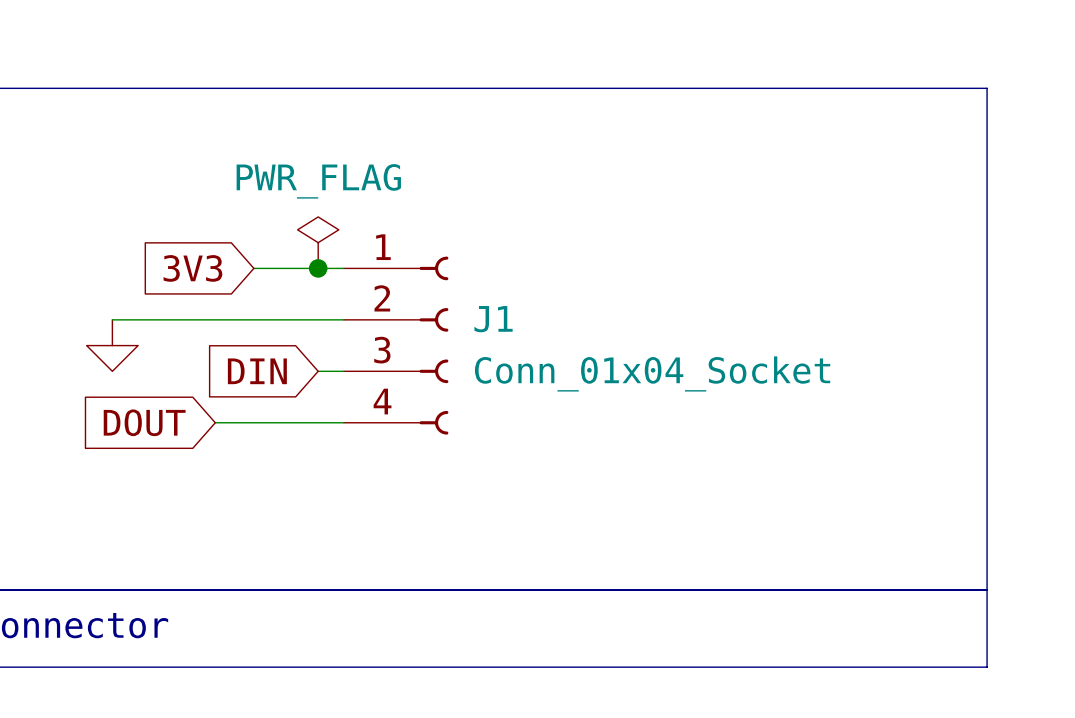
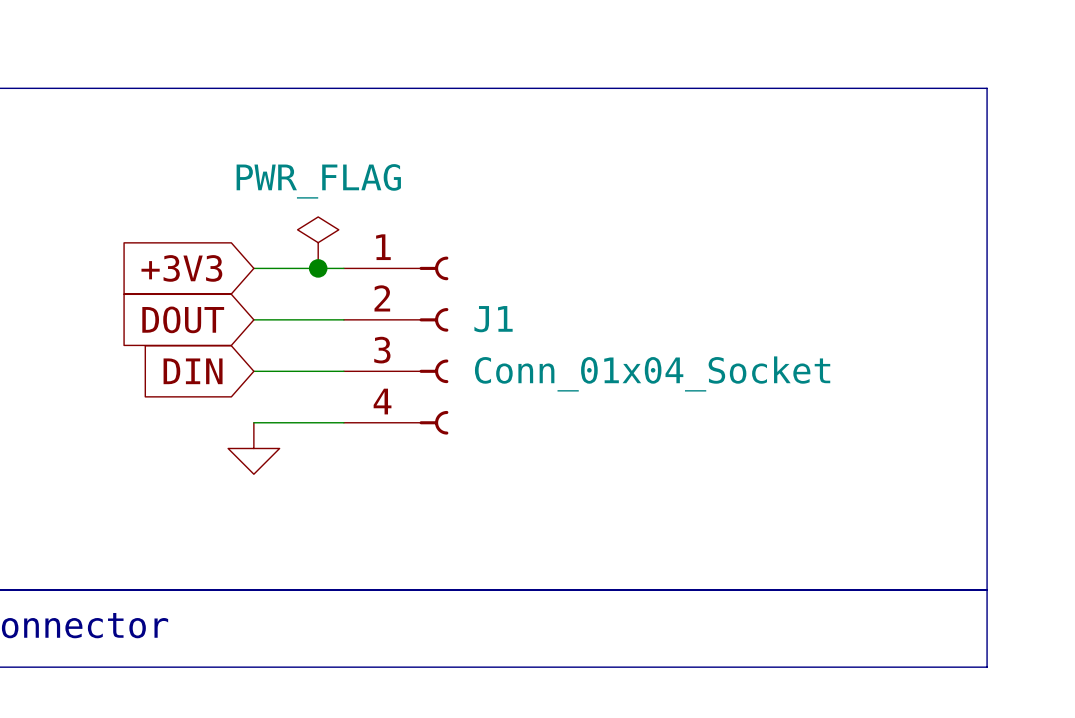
global label: 3V3 (192, 268) -> +3V3 (181, 268)
wire: (112, 319) (253, 319) -> none
power symbol position: (112, 345) -> (253, 448)
wire: none -> (253, 371) (318, 371)
global label position: DIN (257, 371) -> DIN (193, 371)
global label position: DOUT (144, 422) -> DOUT (183, 319)
wire: (215, 422) (253, 422) -> none

